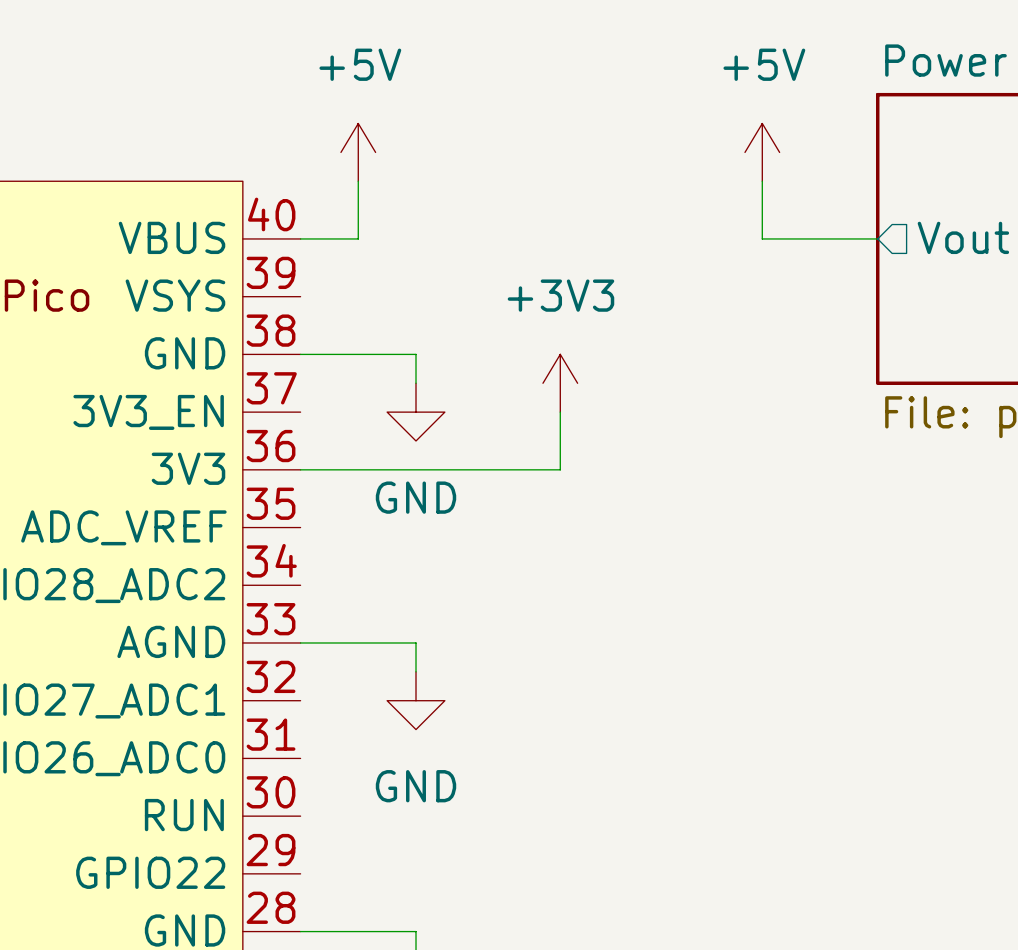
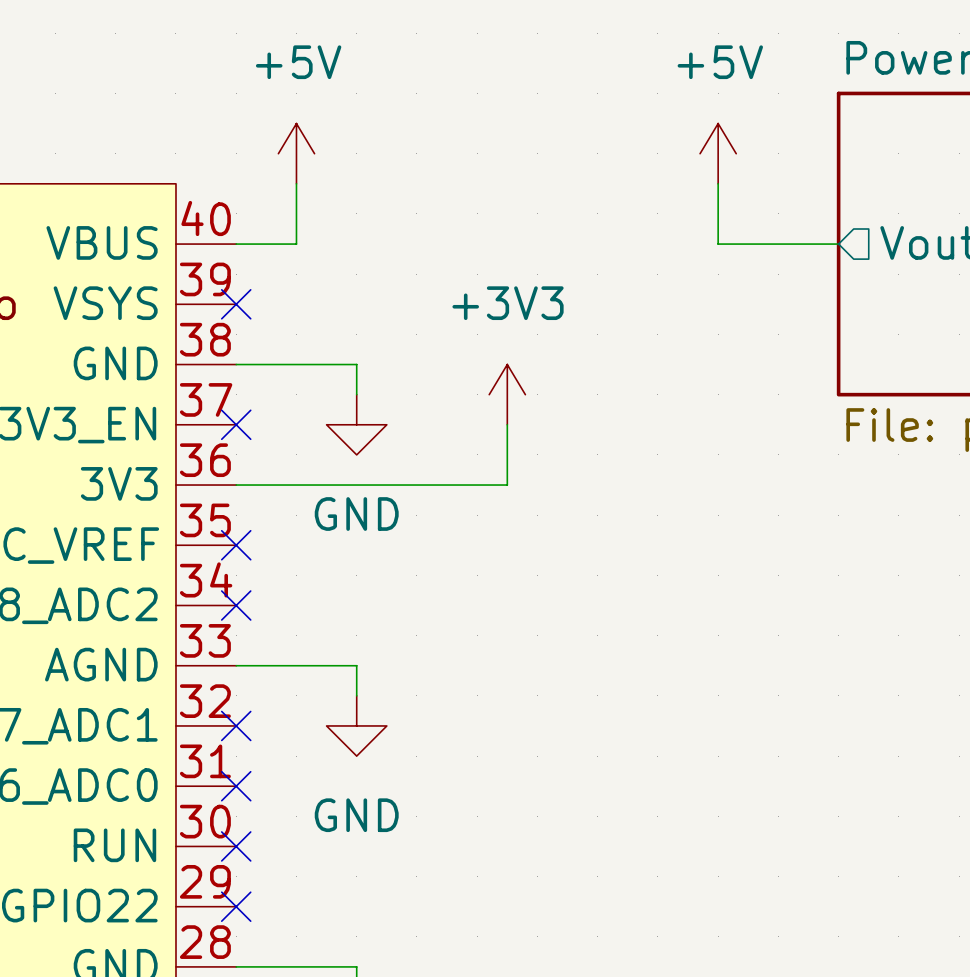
no-connect mark: none -> (236, 304)
no-connect mark: none -> (236, 424)
no-connect mark: none -> (236, 545)
no-connect mark: none -> (236, 605)
no-connect mark: none -> (236, 725)
no-connect mark: none -> (236, 786)
no-connect mark: none -> (236, 846)
no-connect mark: none -> (236, 906)

